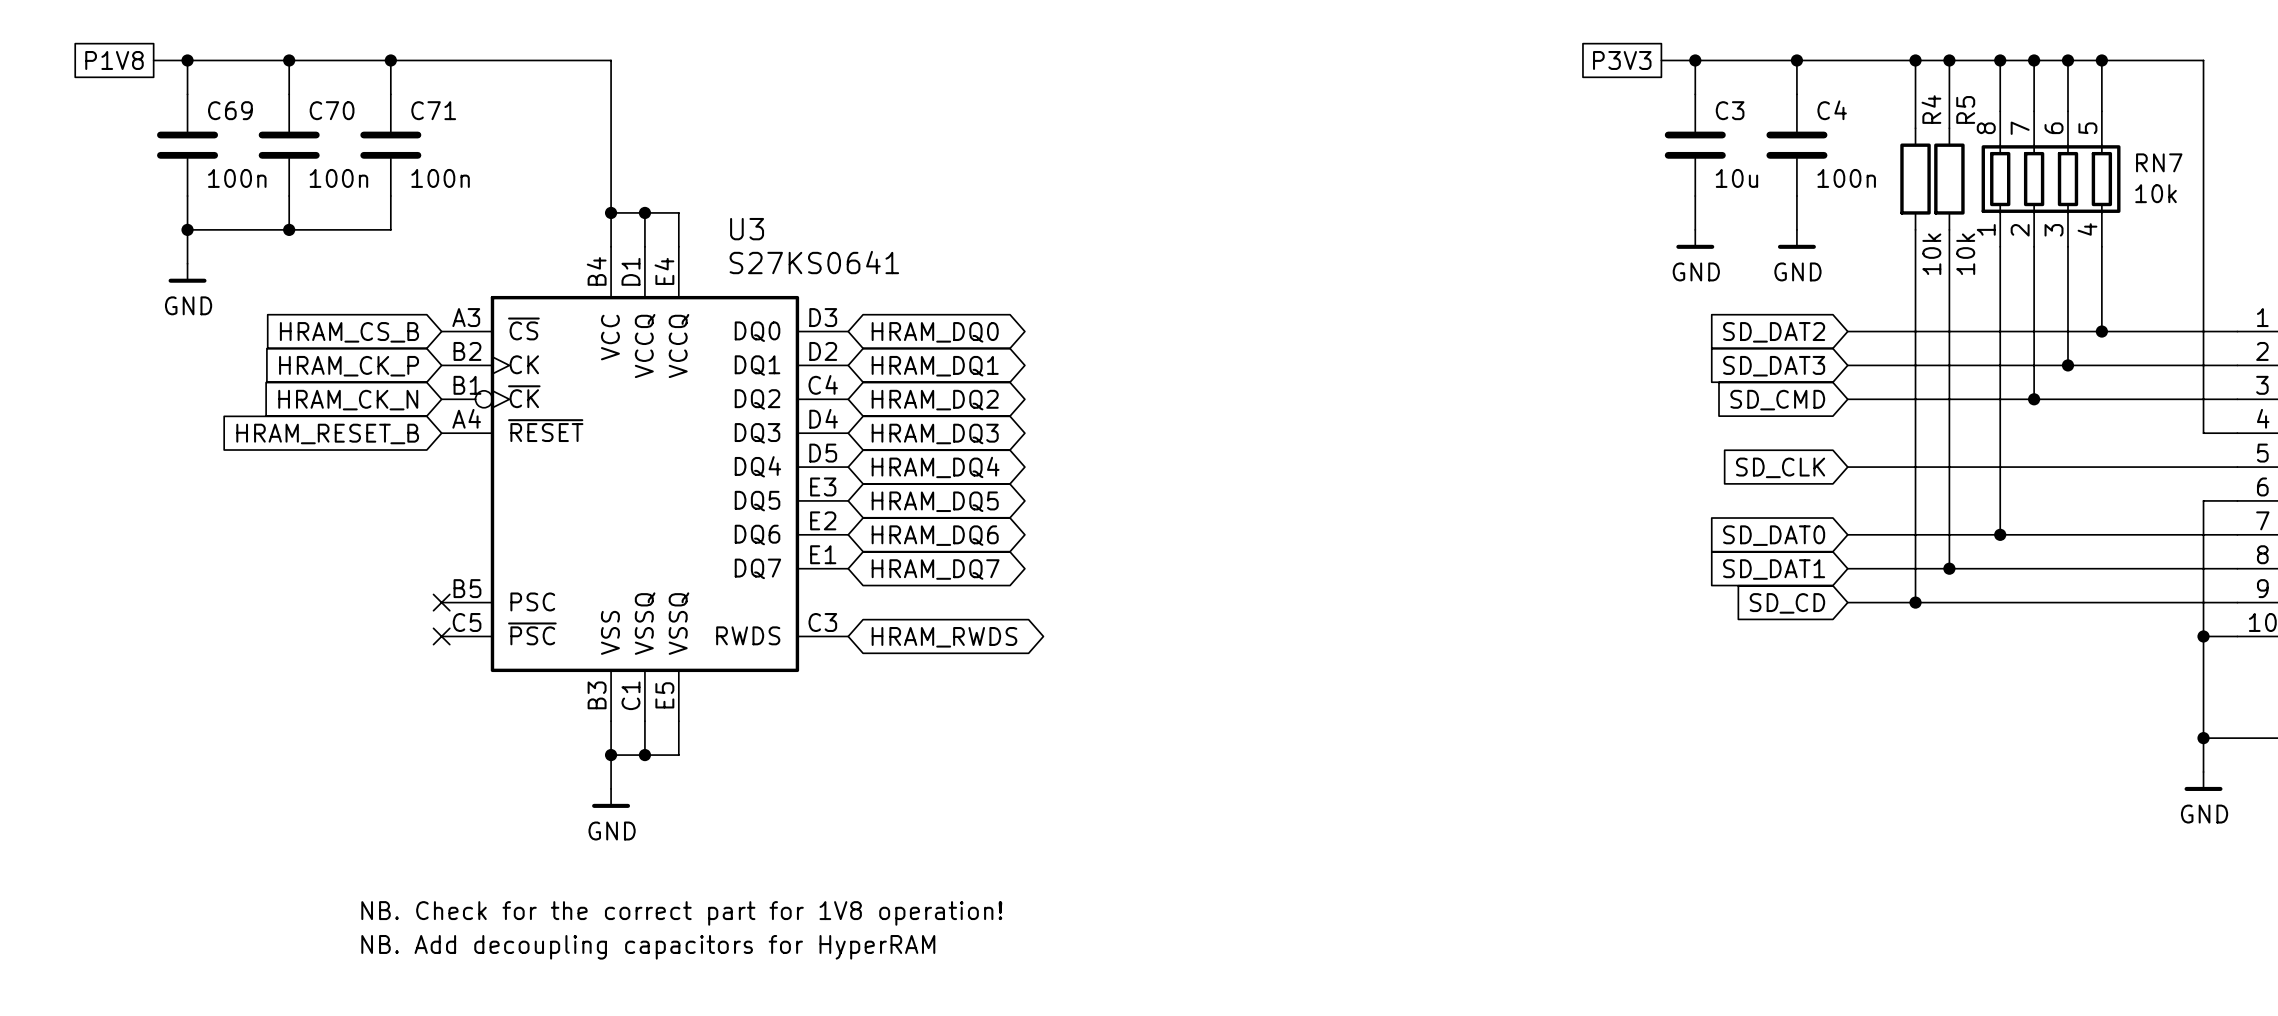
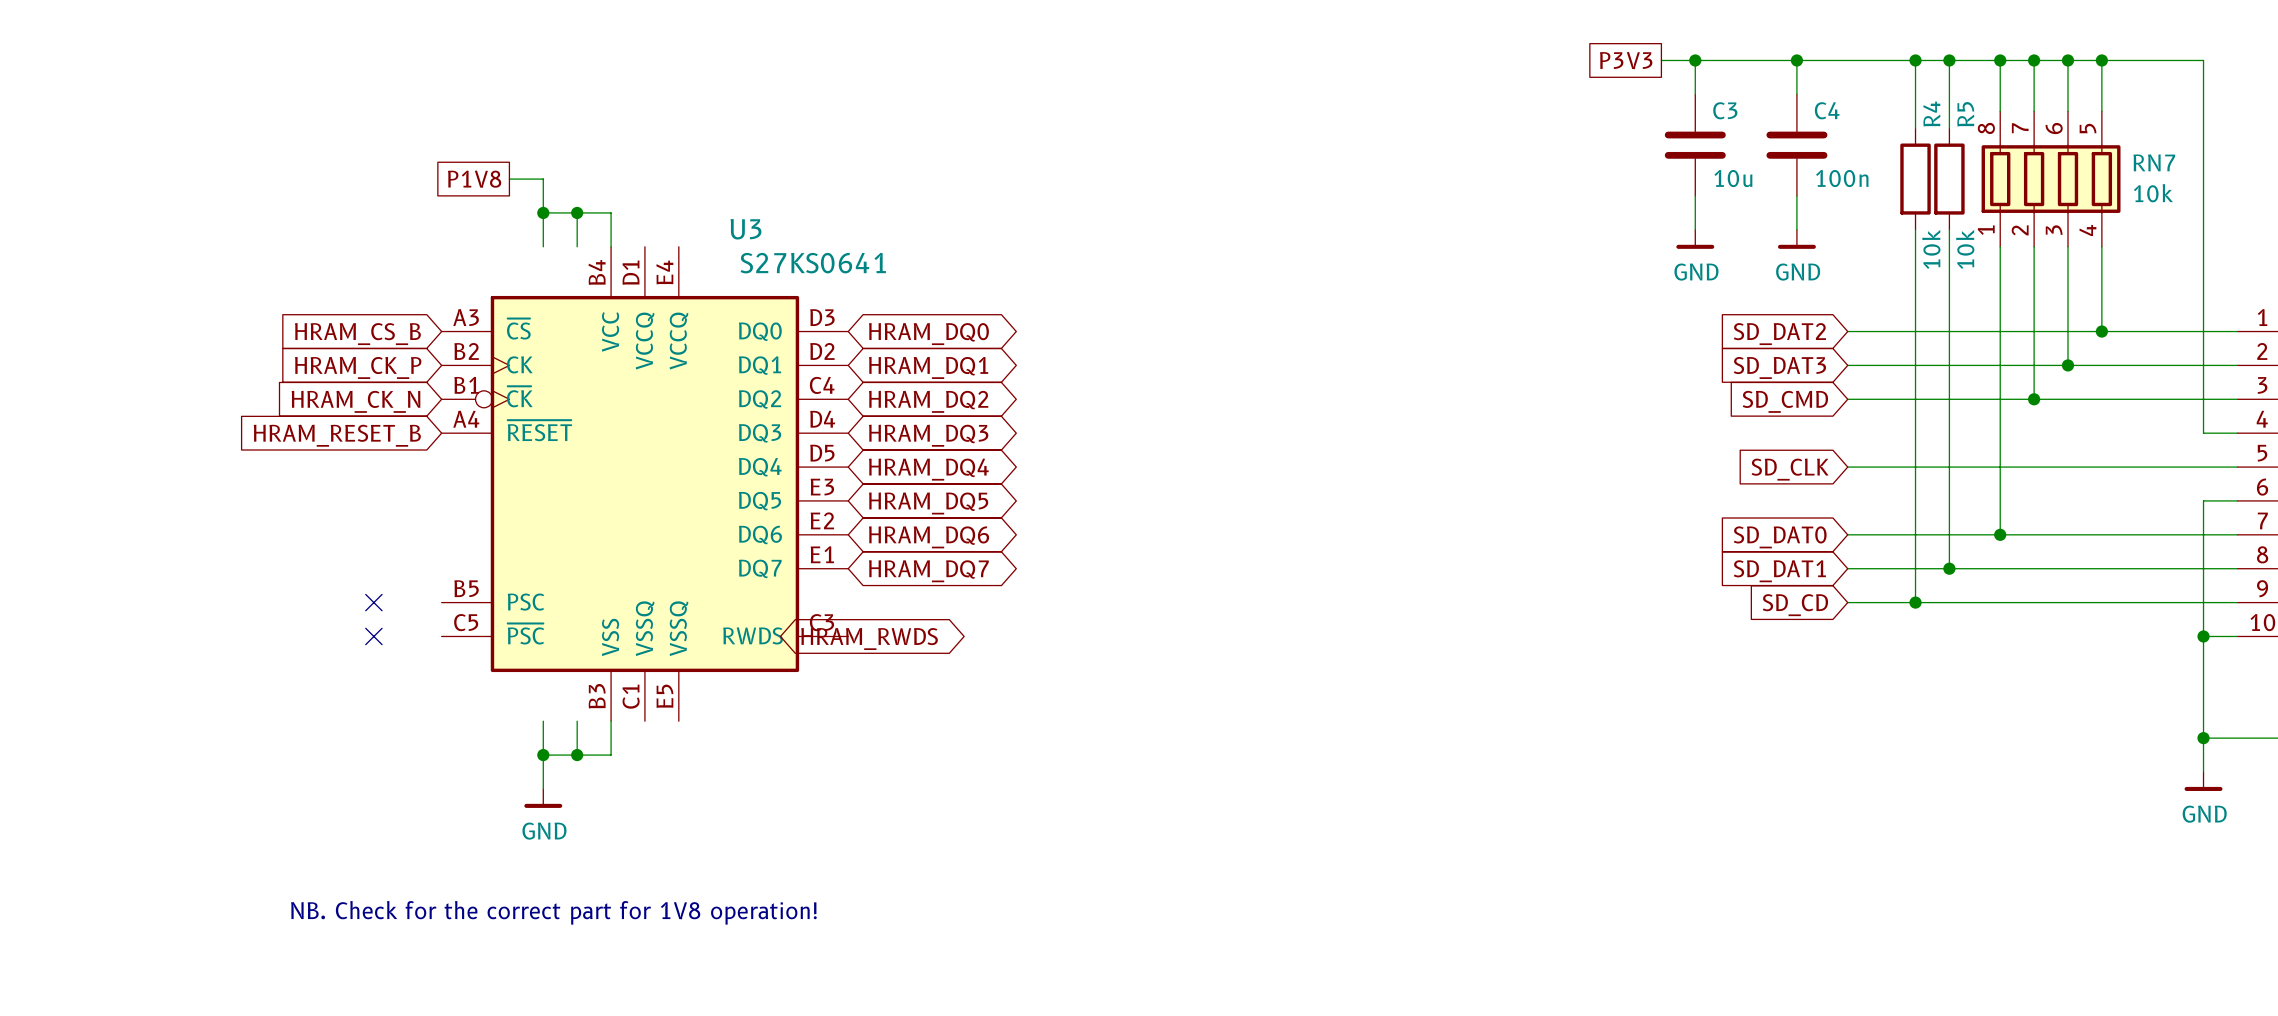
global label: P1V8 (114, 60) -> none
wire: (153, 60) (611, 60) (611, 212) (678, 212) (678, 246) -> none
wire: (187, 60) (187, 94) -> none
junction: (187, 60) -> none
wire: (289, 60) (289, 94) -> none
junction: (289, 60) -> none
wire: (390, 60) (390, 94) -> none
junction: (390, 60) -> none
C69: 100n (187, 145) -> none
C70: 100n (289, 145) -> none
C71: 100n (390, 145) -> none
global label: none -> P1V8 (474, 179)
wire: none -> (509, 179) (543, 179) (543, 246)
wire: (187, 196) (187, 263) -> none
wire: (289, 196) (289, 229) -> none
wire: (390, 196) (390, 229) (187, 229) -> none
wire: none -> (543, 212) (611, 212)
junction: none -> (543, 212)
junction: none -> (577, 212)
junction: (611, 212) -> none
wire: (644, 212) (644, 246) -> (577, 212) (577, 246)
junction: (644, 212) -> none
junction: (187, 229) -> none
junction: (289, 229) -> none
power symbol: GND (187, 273) -> none
no-connect mark: none -> (373, 602)
no-connect mark: (441, 602) -> none
no-connect mark: none -> (373, 636)
no-connect mark: (441, 636) -> none
global label position: HRAM_RWDS (944, 637) -> HRAM_RWDS (869, 639)
wire: none -> (543, 721) (543, 788)
wire: (644, 721) (644, 755) -> (577, 721) (577, 755)
wire: (678, 721) (678, 755) (611, 755) (611, 788) -> none
wire: none -> (543, 755) (611, 755)
junction: none -> (543, 755)
junction: none -> (577, 755)
junction: (611, 755) -> none
junction: (644, 755) -> none
power symbol position: GND (611, 798) -> GND (543, 798)
text position: NB. Check for the correct part for 1V8 operation! (681, 913) -> NB. Check for the correct part for 1V8 operation! (553, 912)
text: NB. Add decoupling capacitors for HyperRAM (648, 947) -> none

